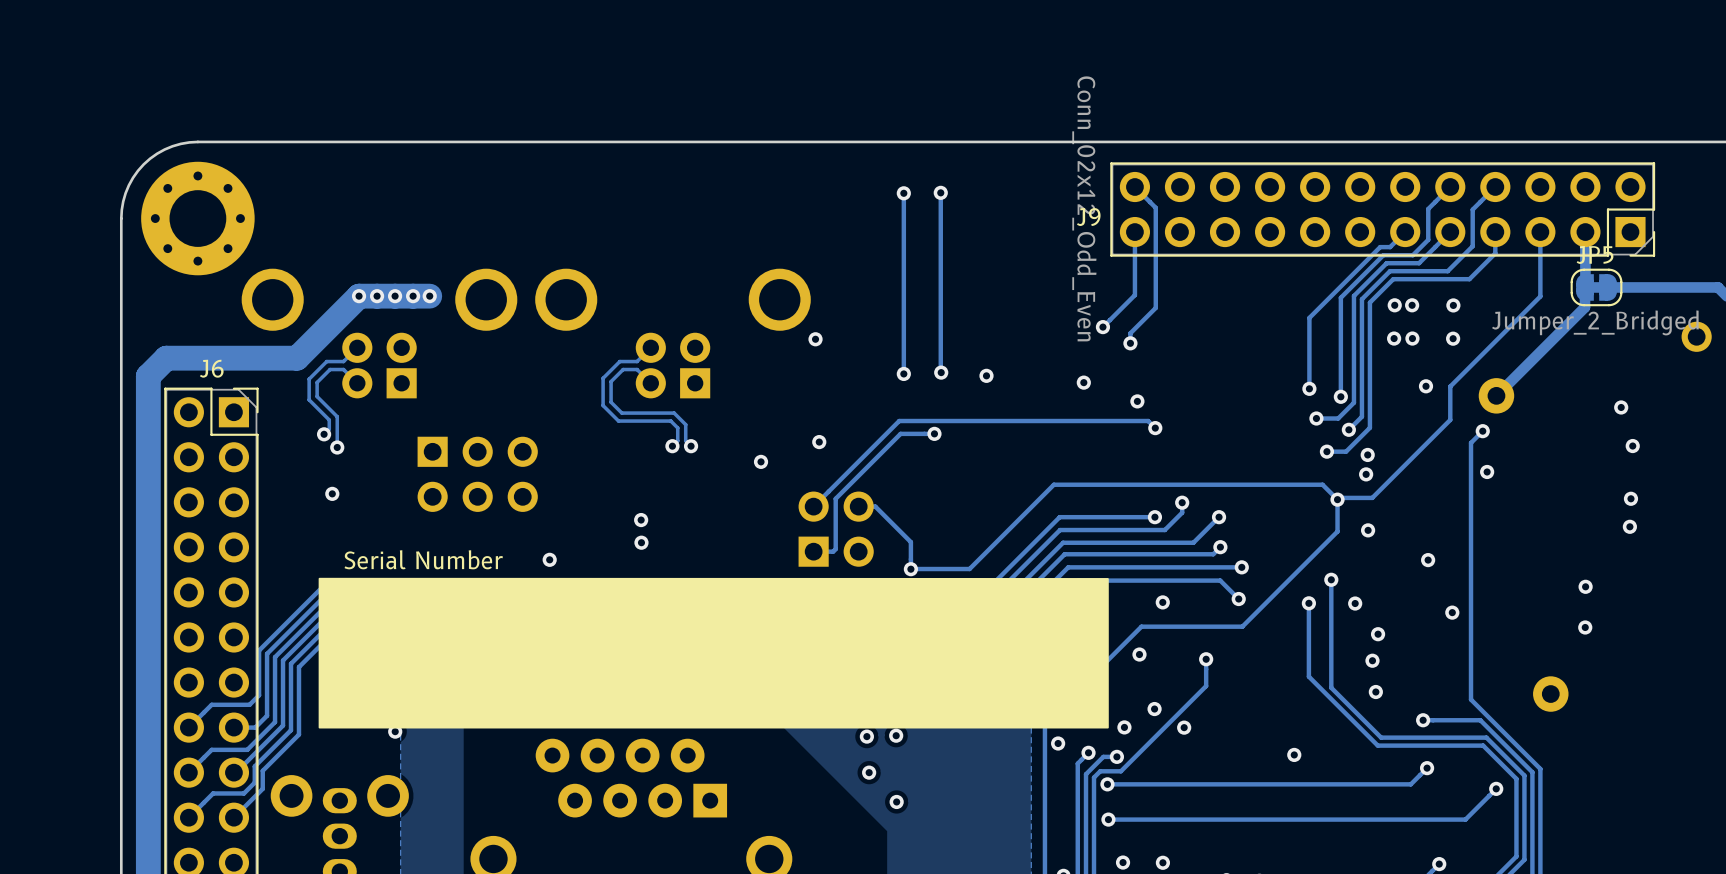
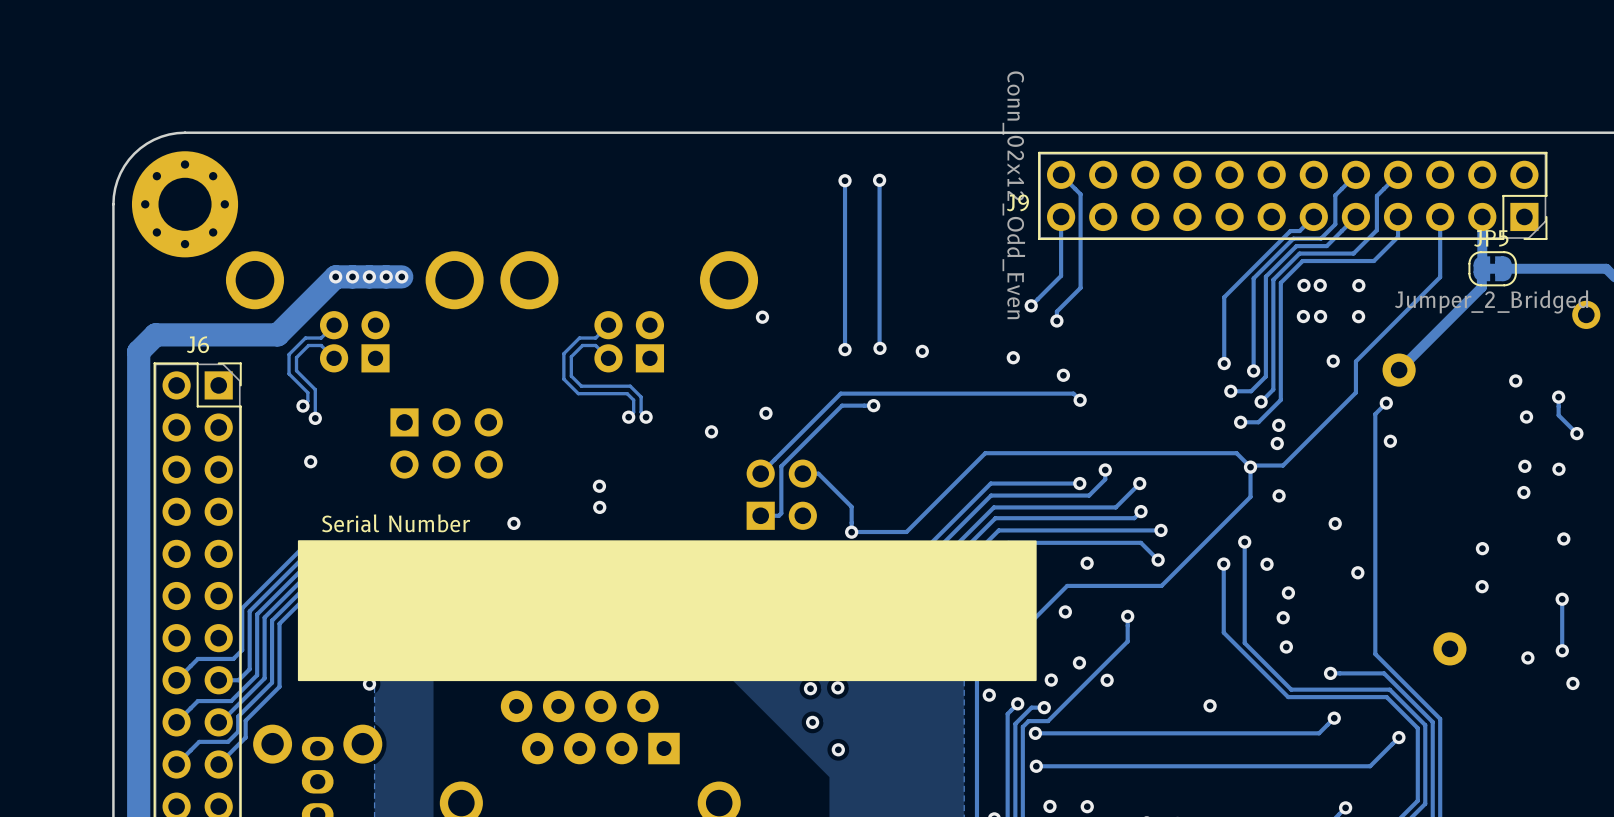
track: none -> (1558, 397) (1558, 415) (1576, 433)
via: none -> (1558, 397)
via: none -> (1576, 433)
via: none -> (1558, 469)
via: none -> (1563, 538)
track: none -> (1562, 599) (1562, 650)
via: none -> (1562, 599)
via: none -> (1562, 650)
via: none -> (1527, 657)
via: none -> (1572, 683)

